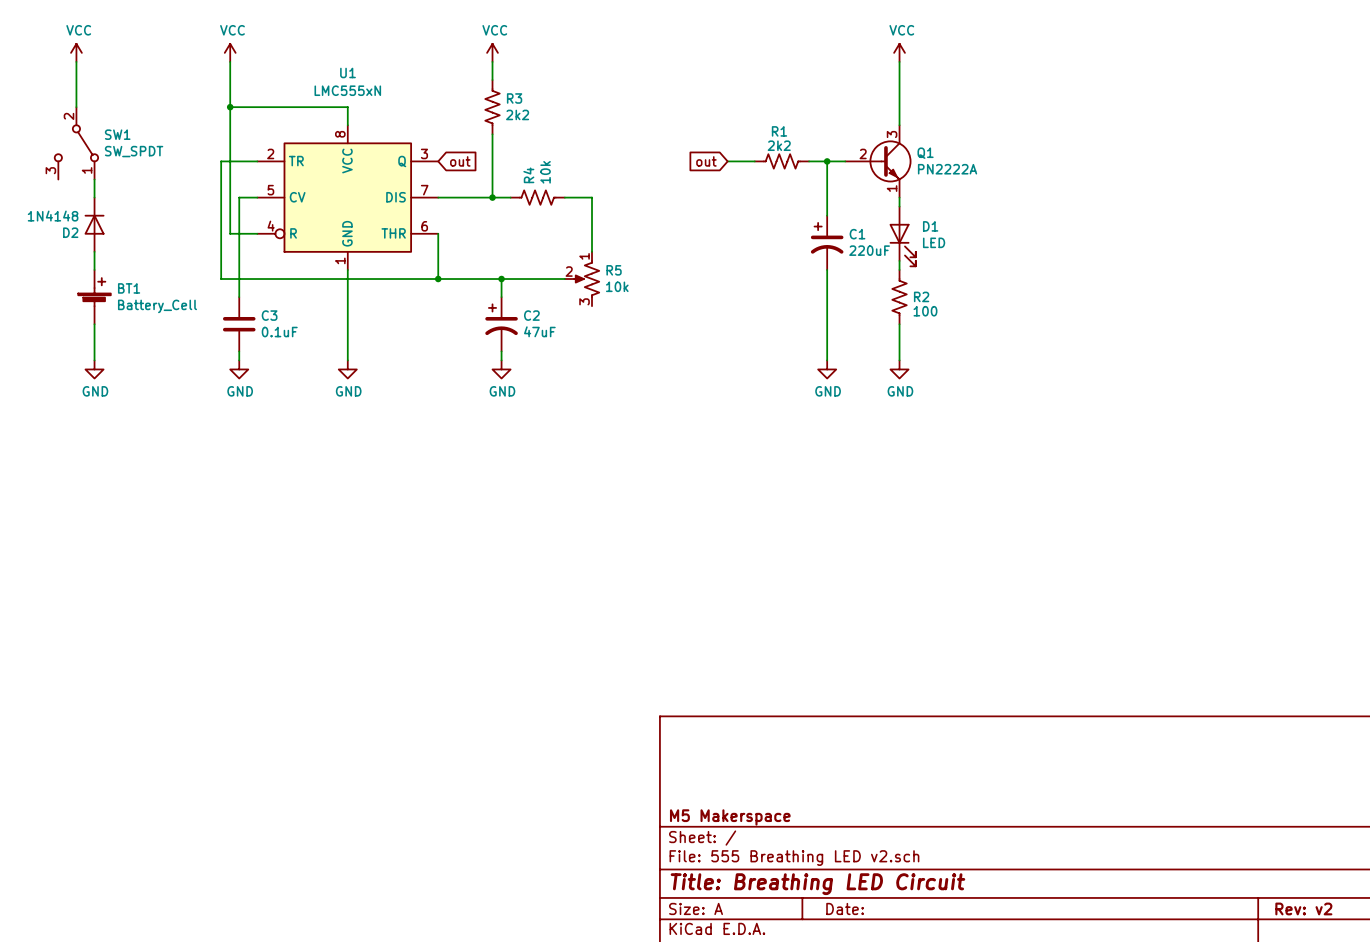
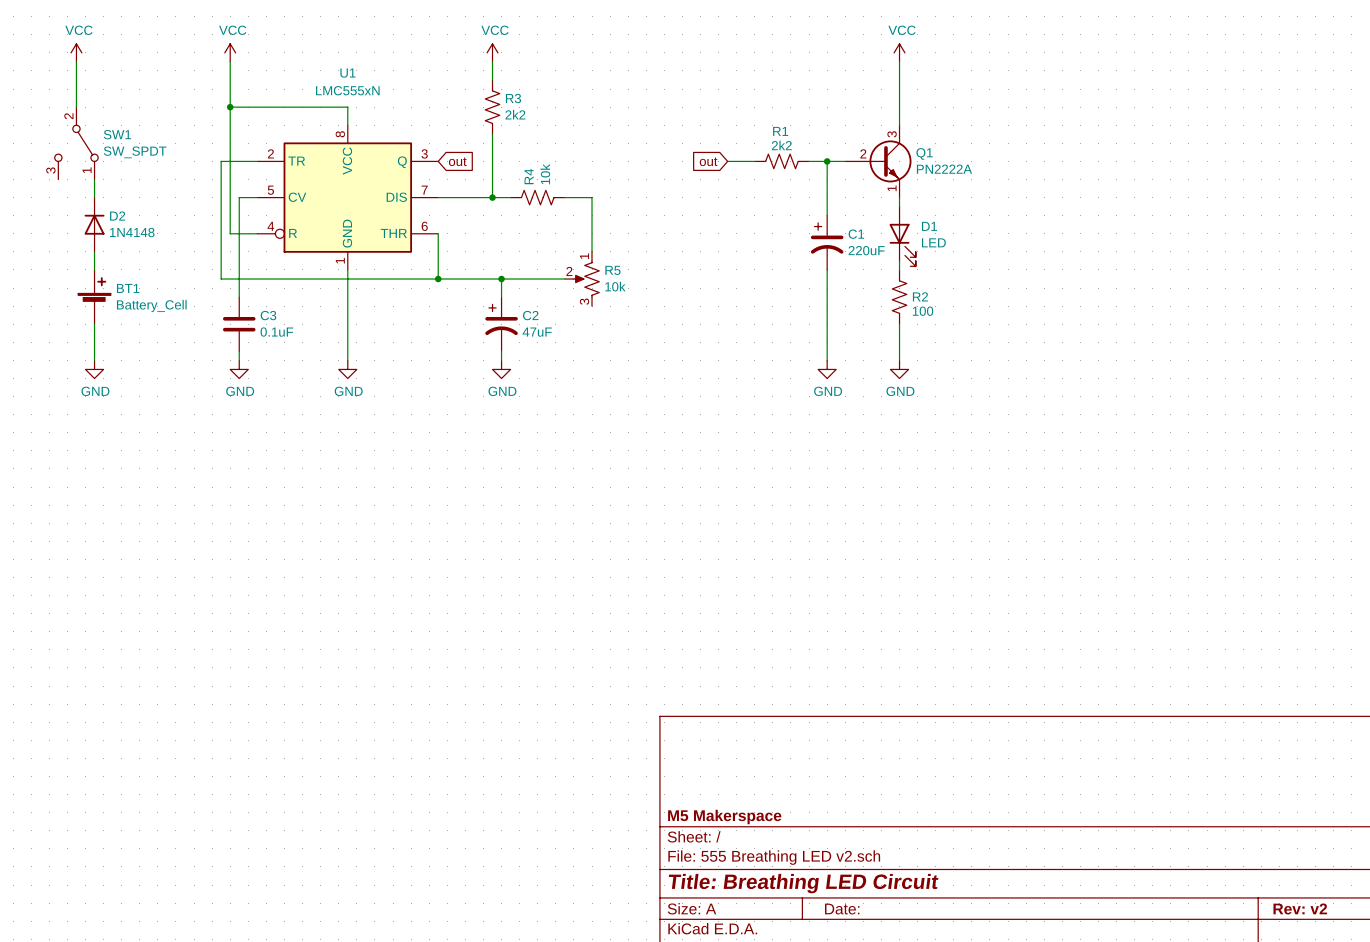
D2 value position: 1N4148 (53, 216) -> 1N4148 (132, 232)
D2 name position: D2 (70, 232) -> D2 (117, 216)

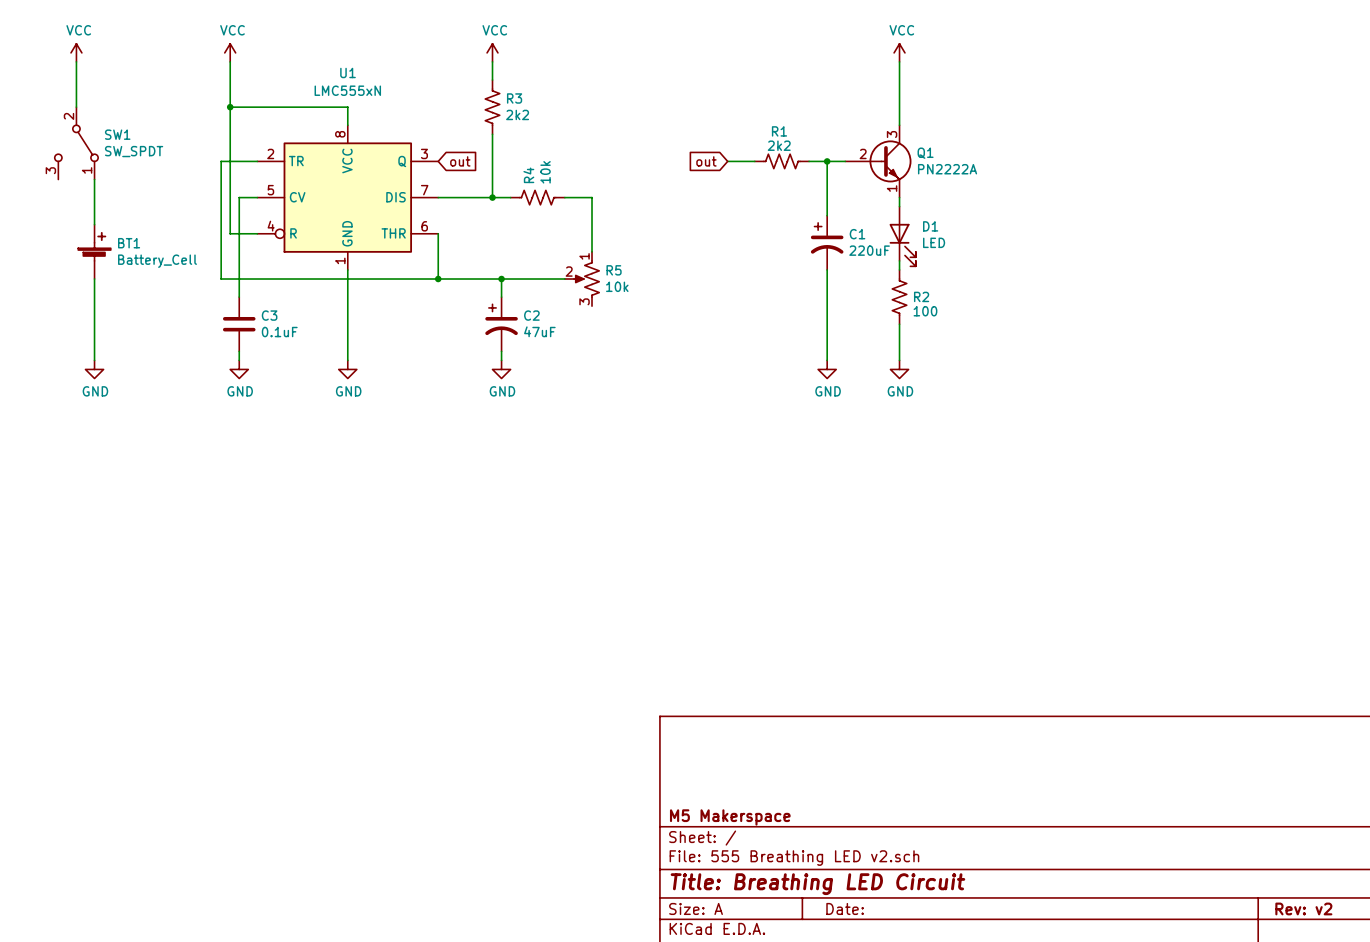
D2: 1N4148 (94, 224) -> none
BT1 position: (94, 297) -> (94, 251)

